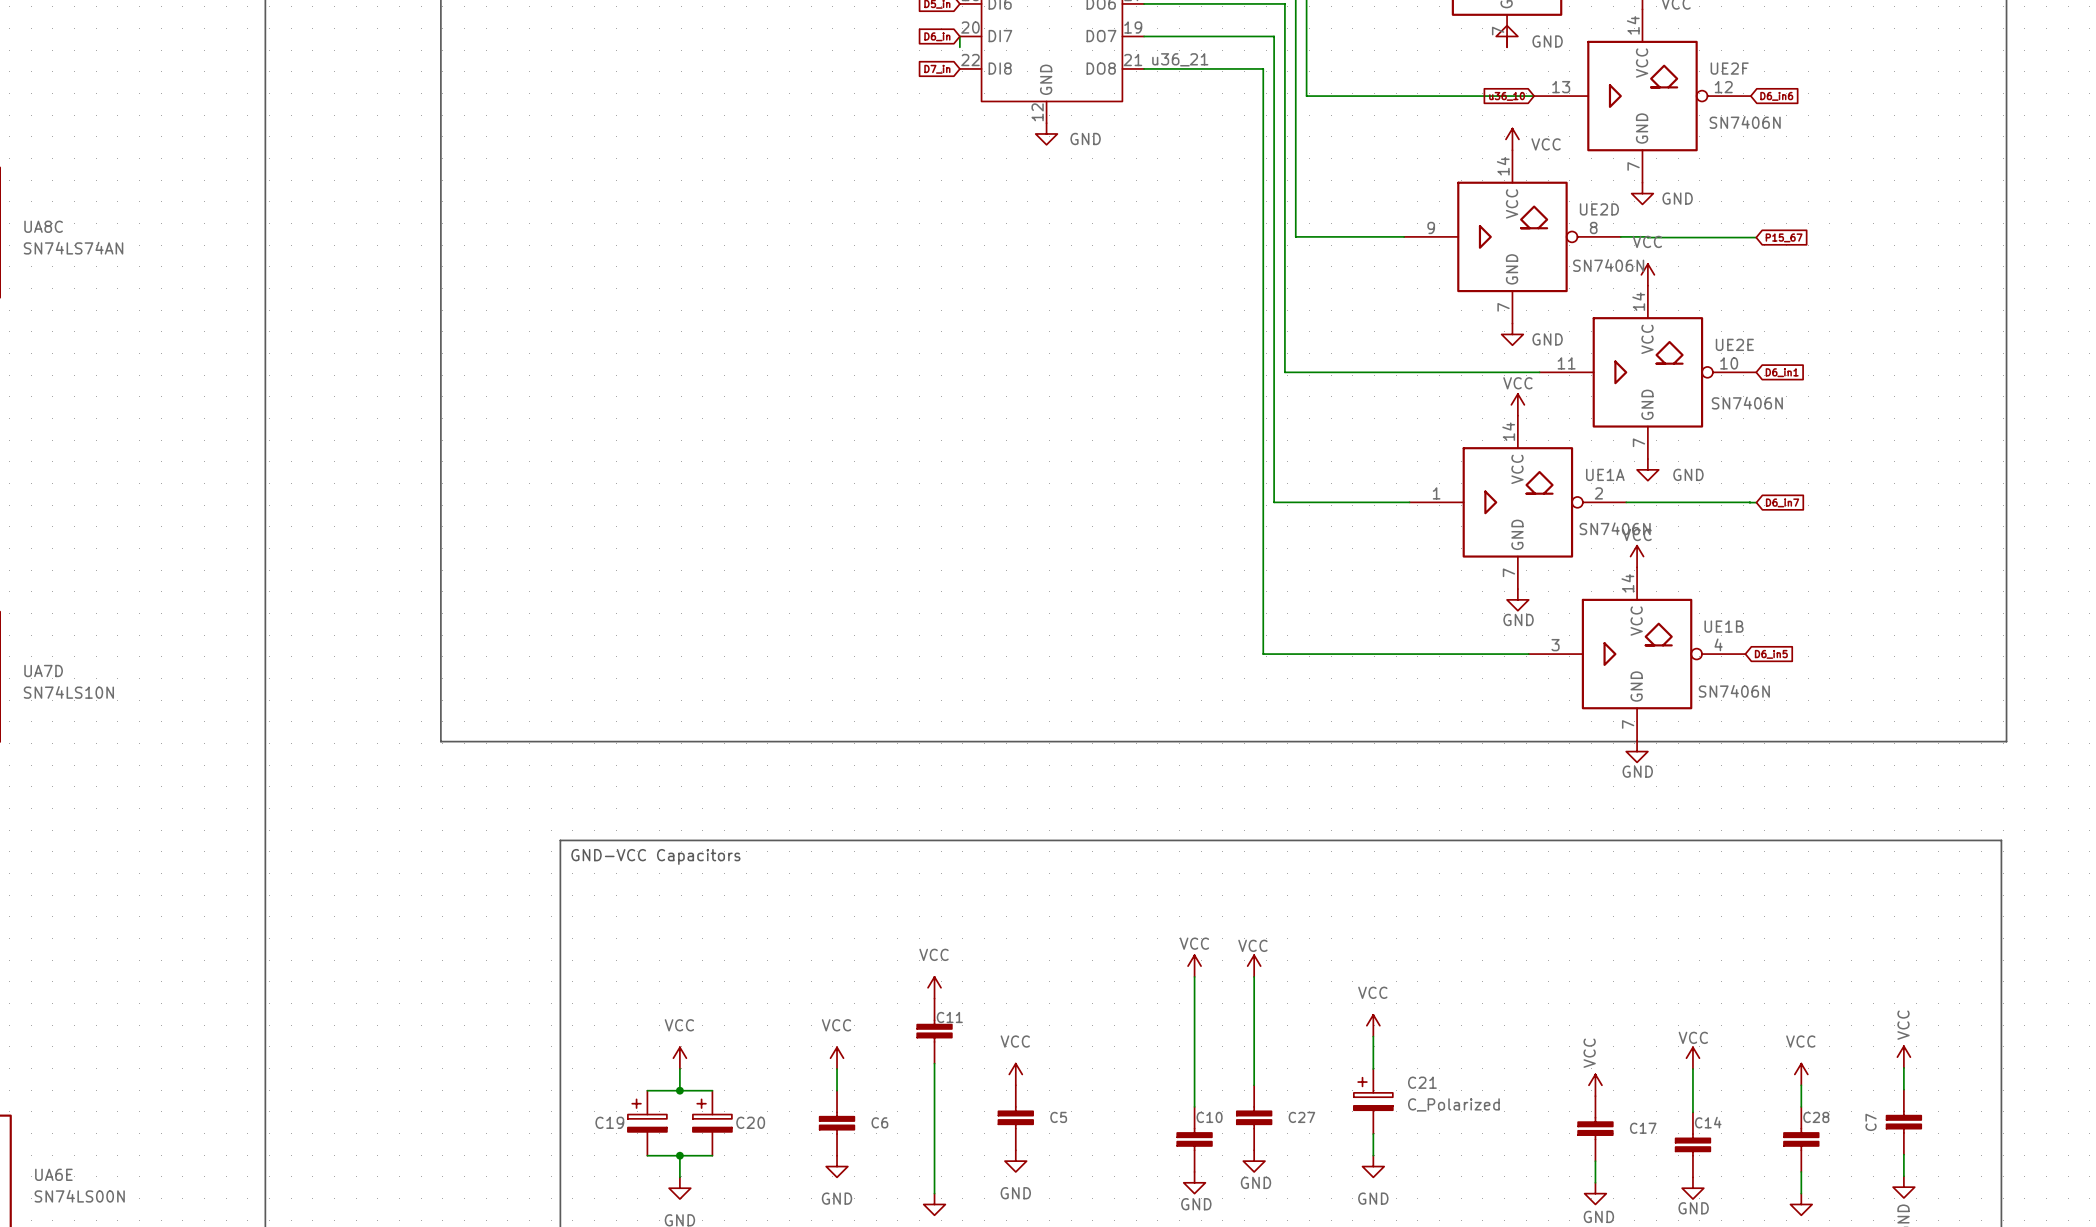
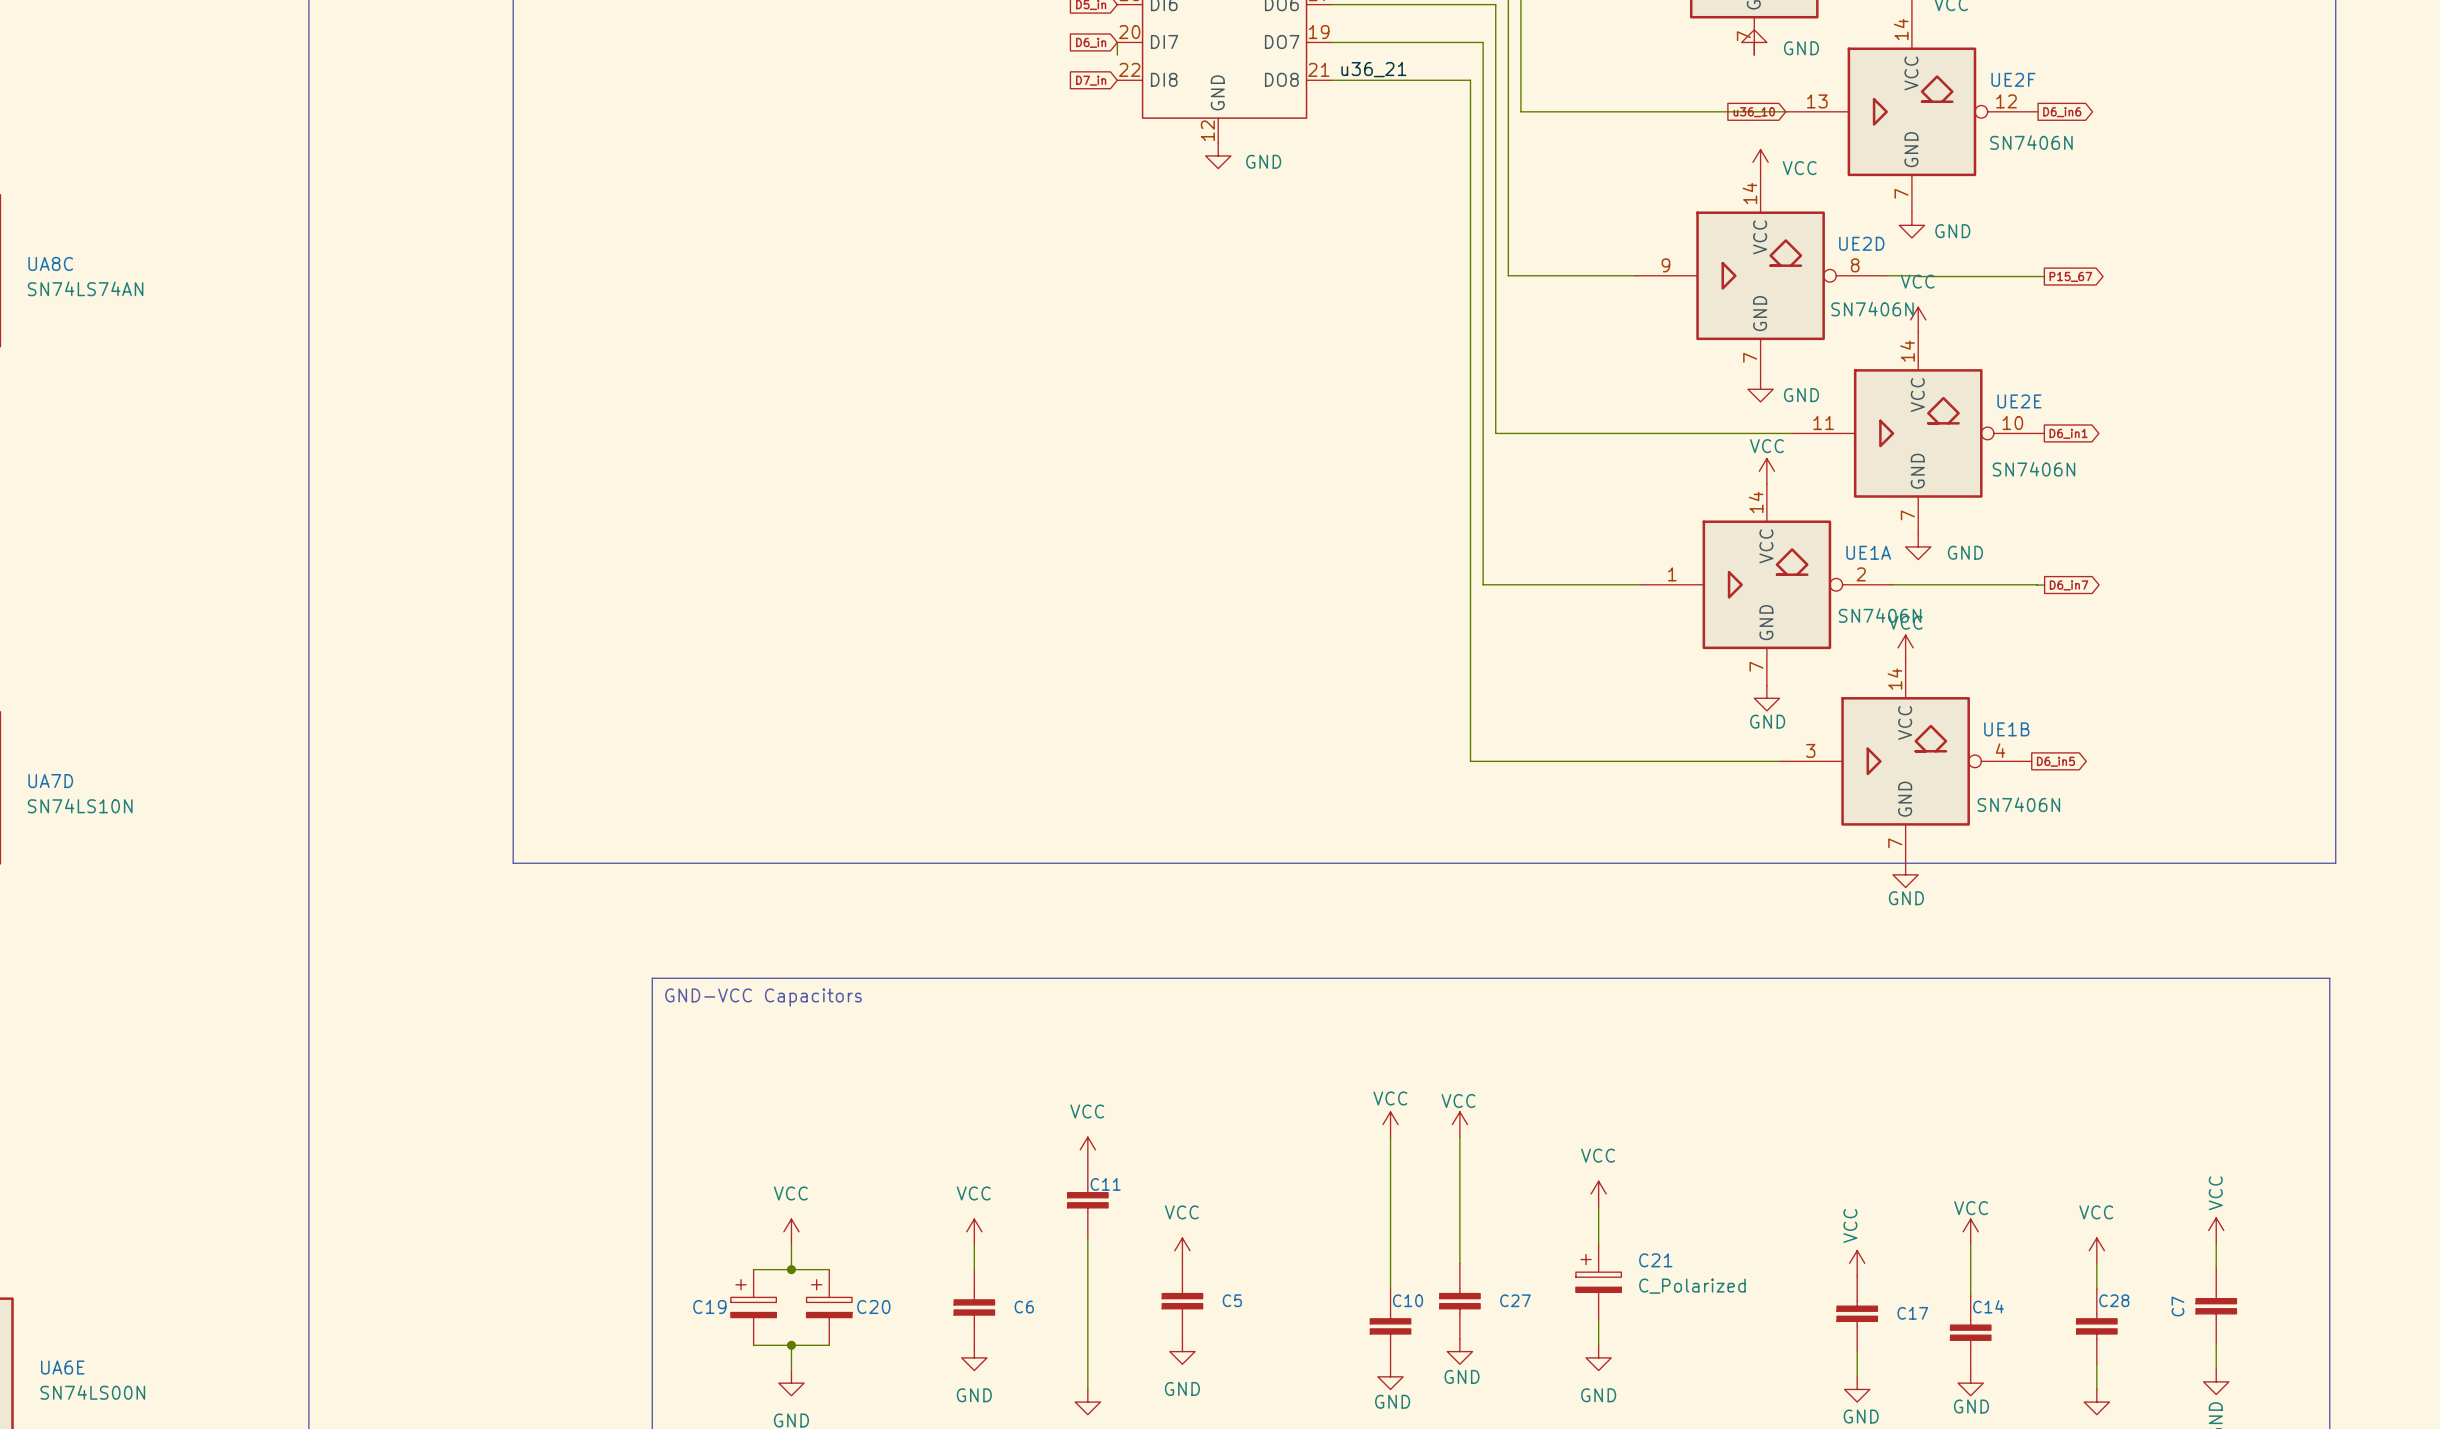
global label shape: input (1776, 96) -> output (2062, 112)
global label shape: input (1784, 237) -> output (2070, 276)
global label shape: input (1782, 372) -> output (2068, 433)
global label shape: input (1782, 502) -> output (2069, 585)
global label shape: input (1771, 654) -> output (2055, 761)

